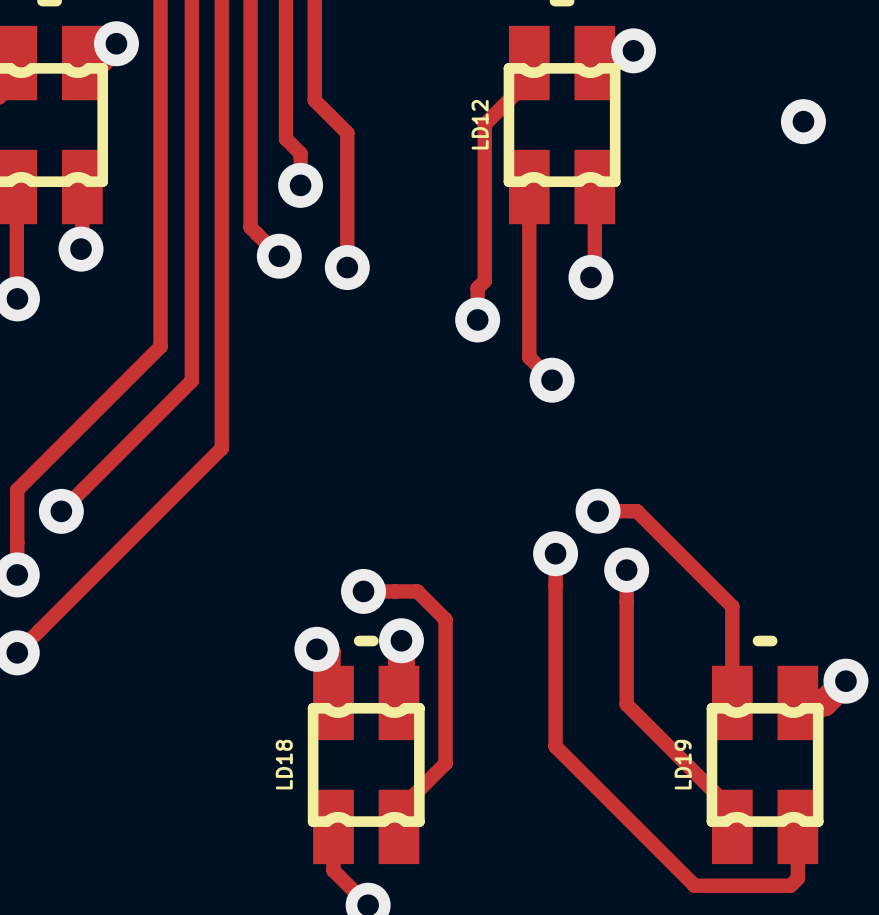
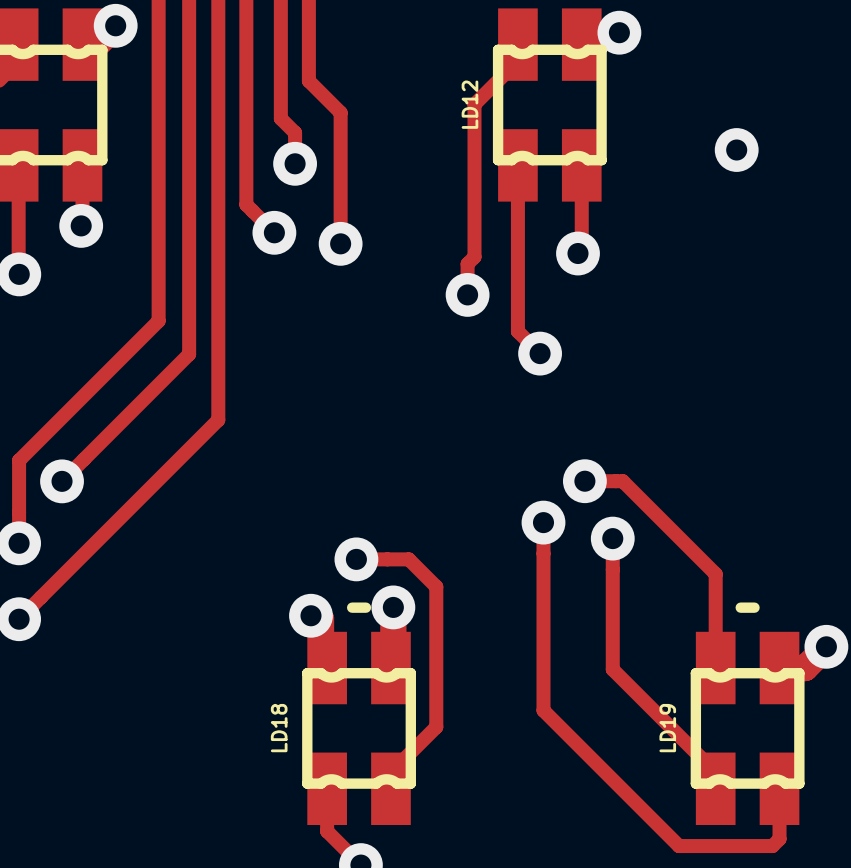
via position: (803, 121) -> (736, 150)

